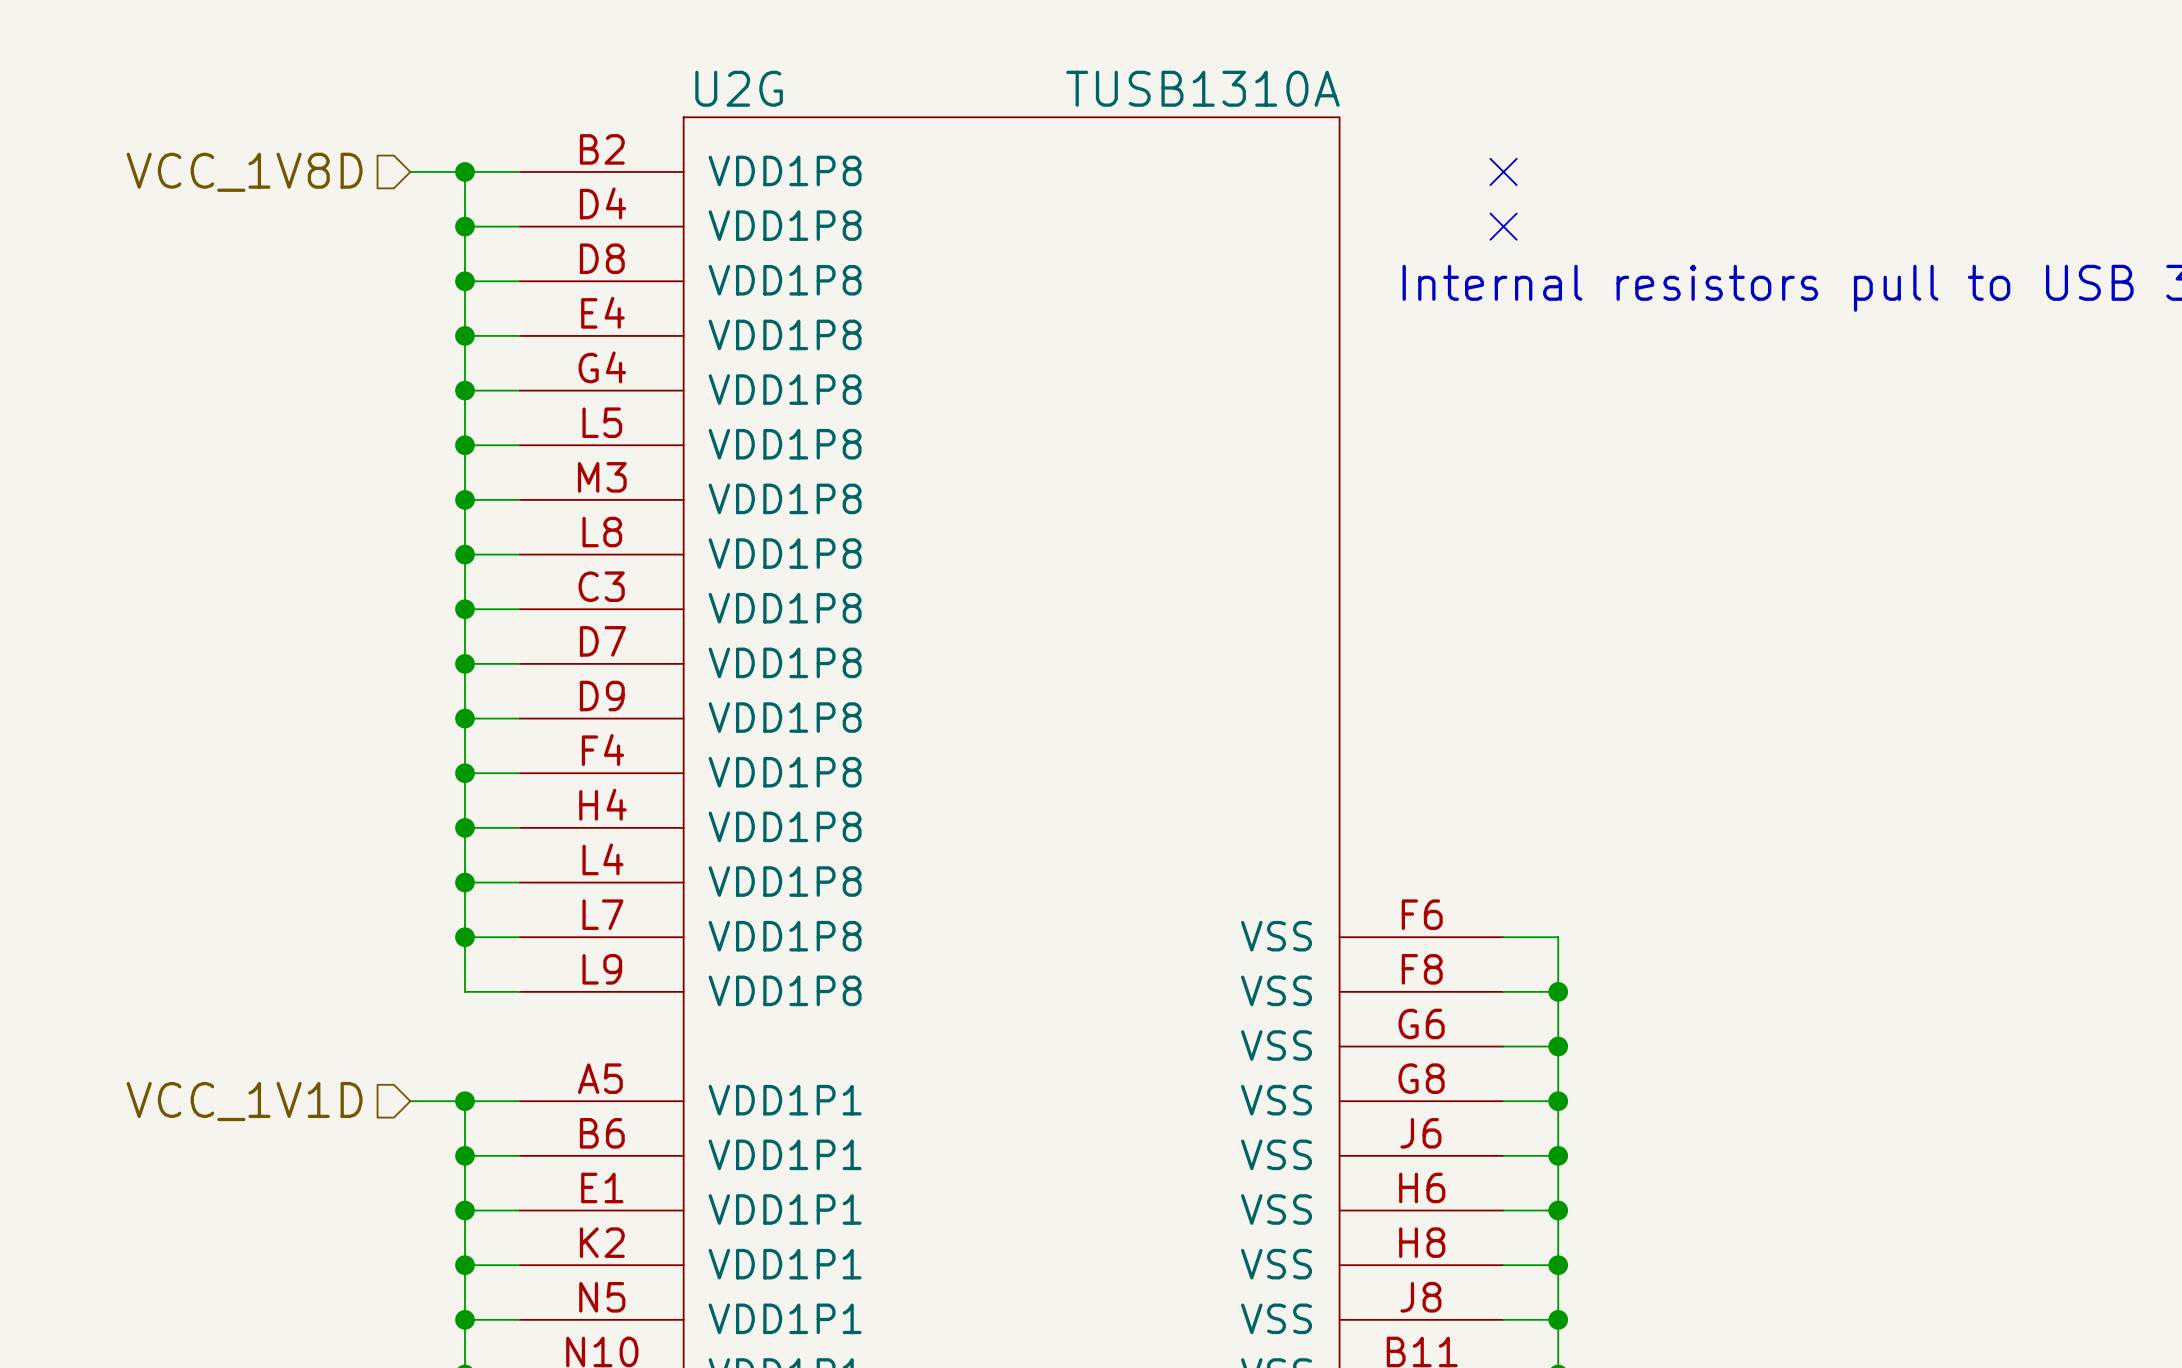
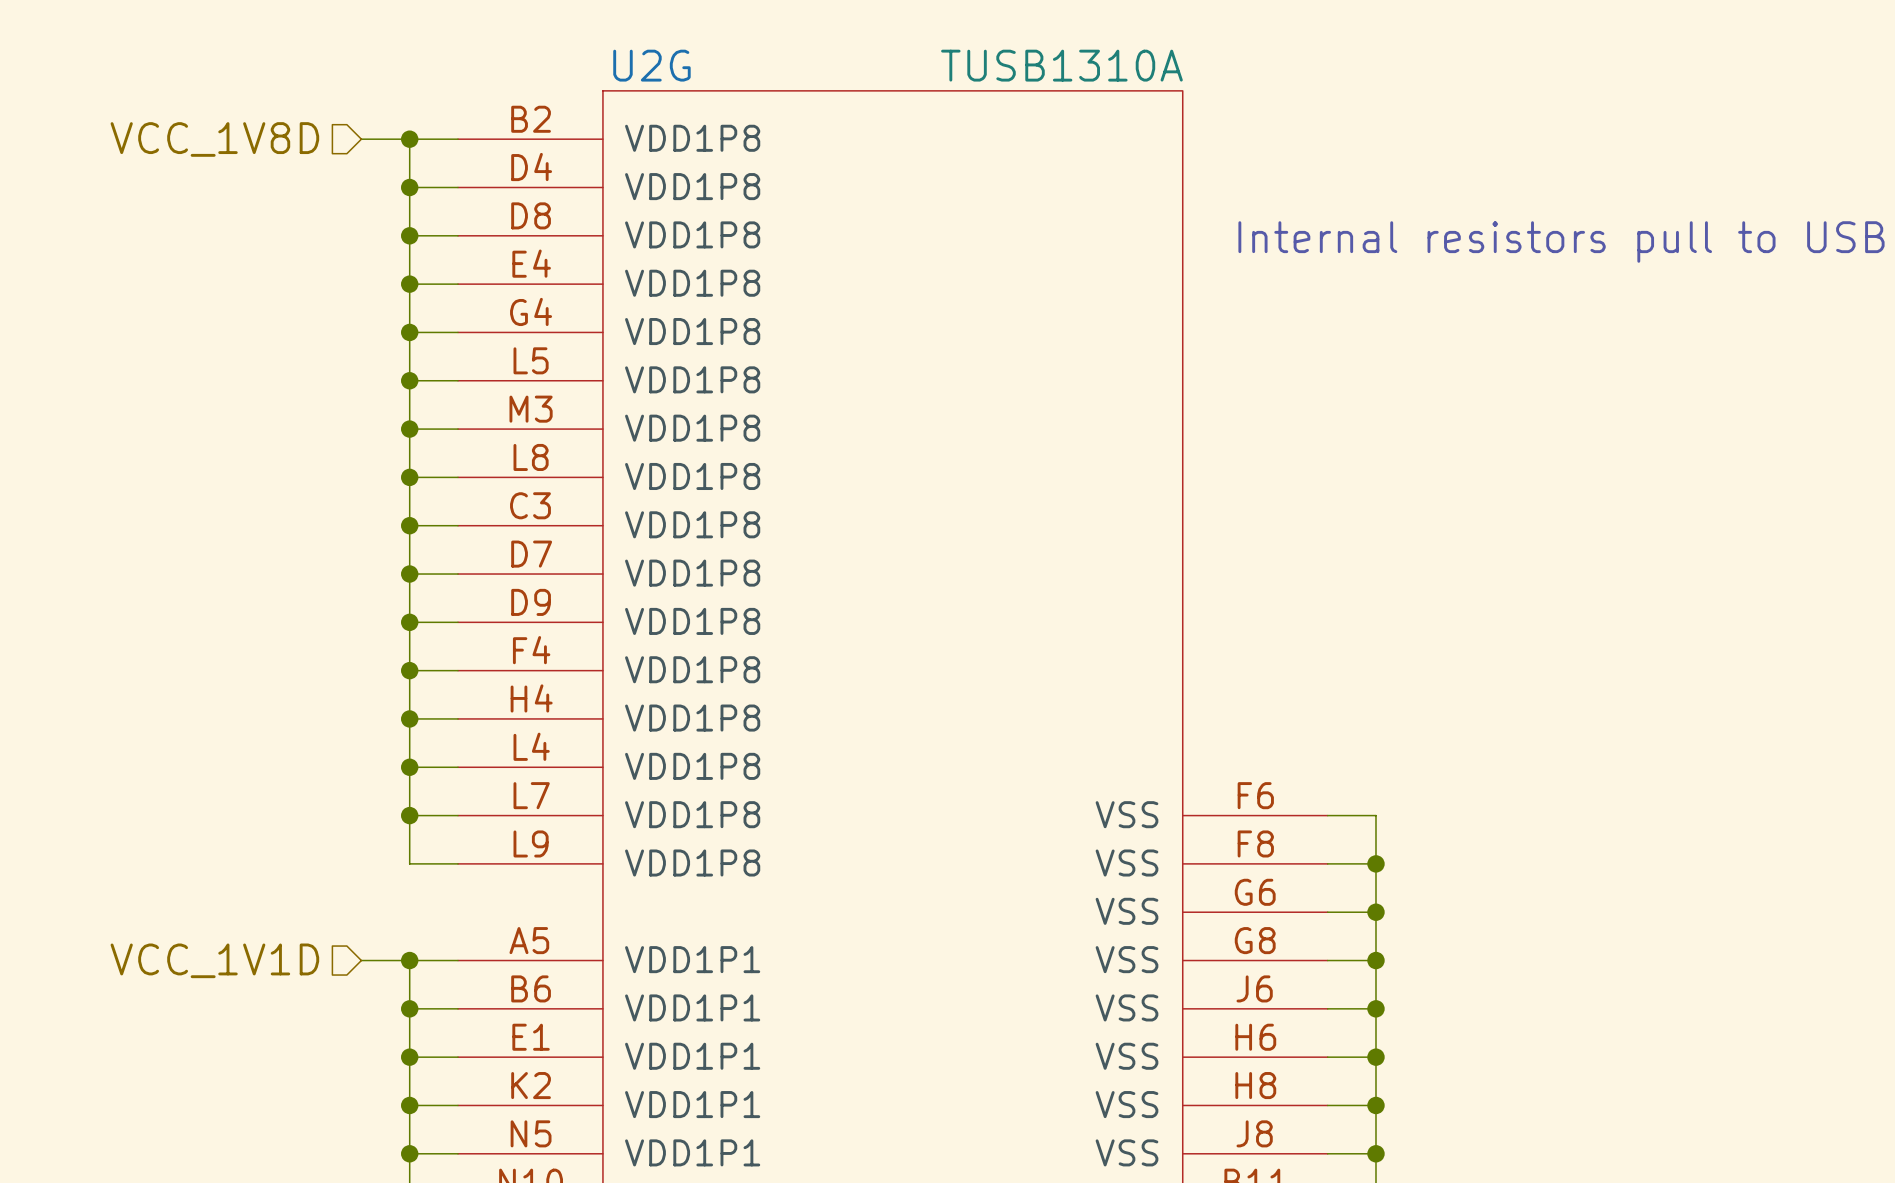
no-connect mark: (1503, 171) -> none
no-connect mark: (1503, 226) -> none

